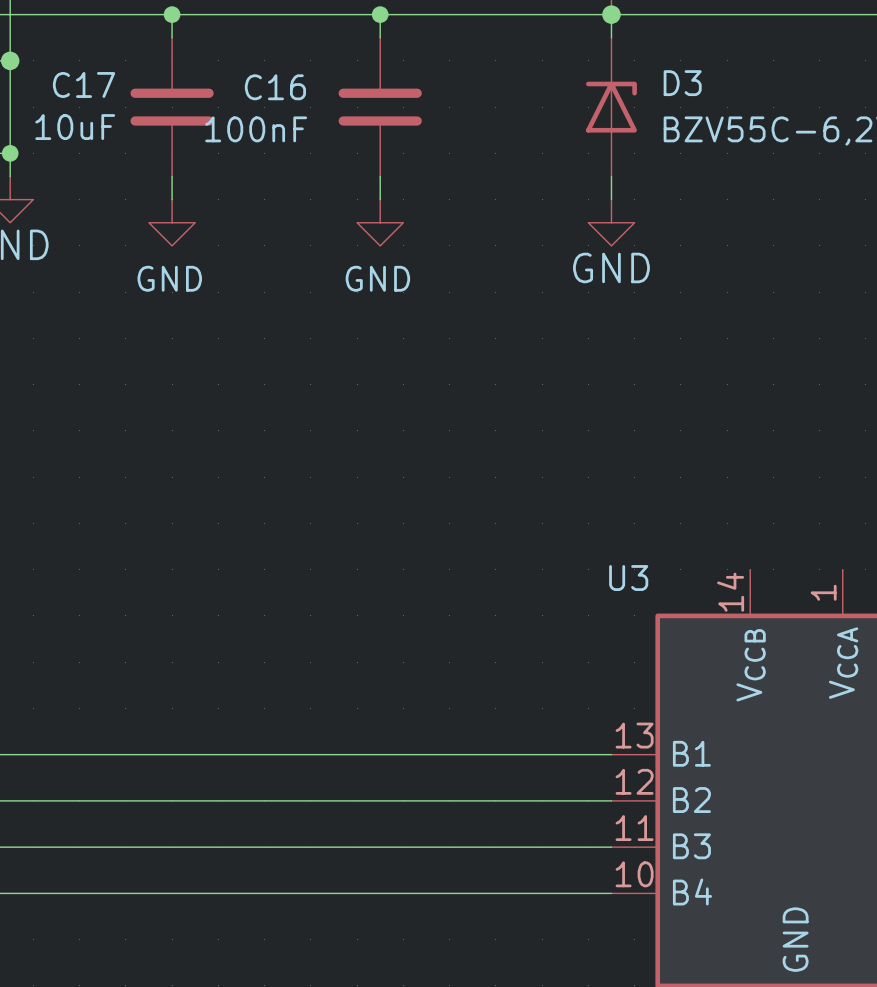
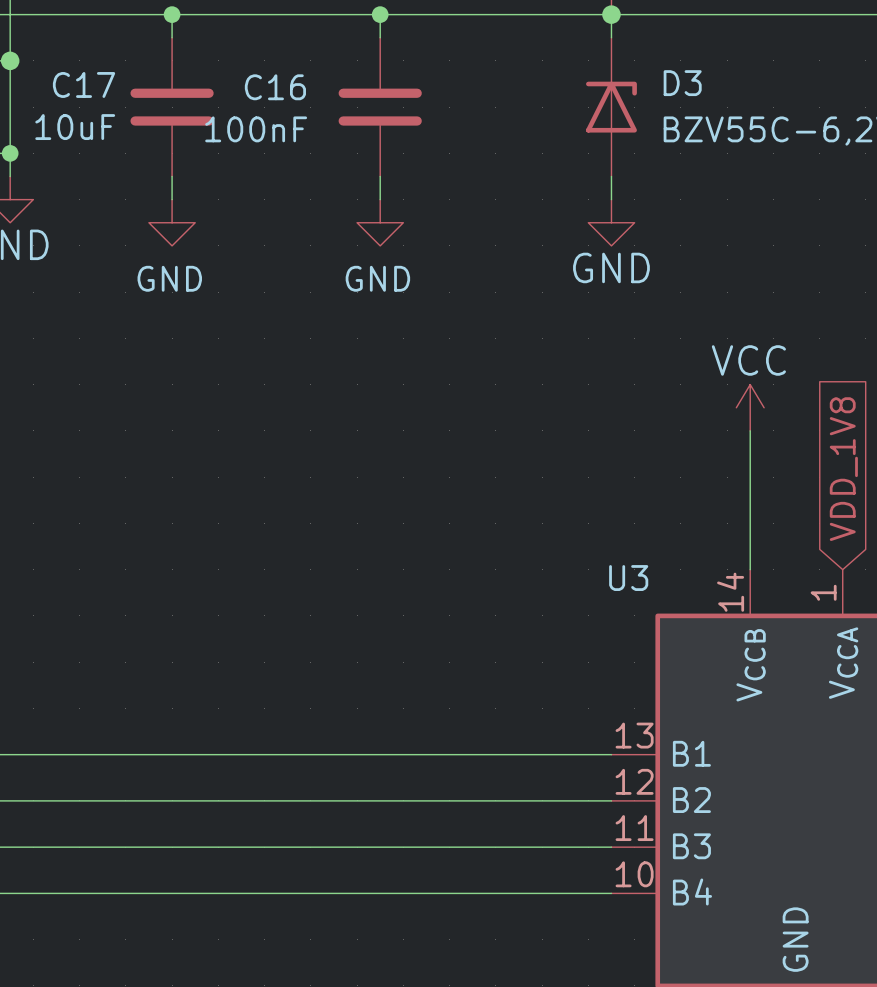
power symbol: none -> VCC (750, 407)
wire: none -> (750, 430) (750, 569)
global label: none -> VDD_1V8 (843, 469)

